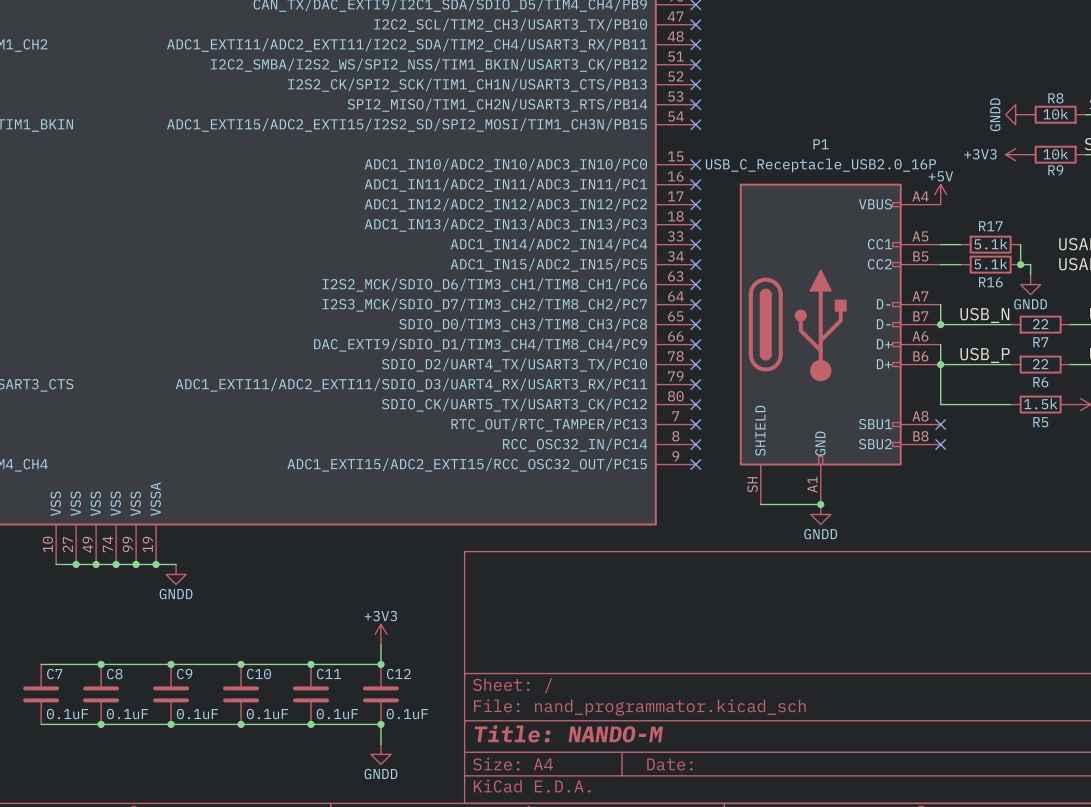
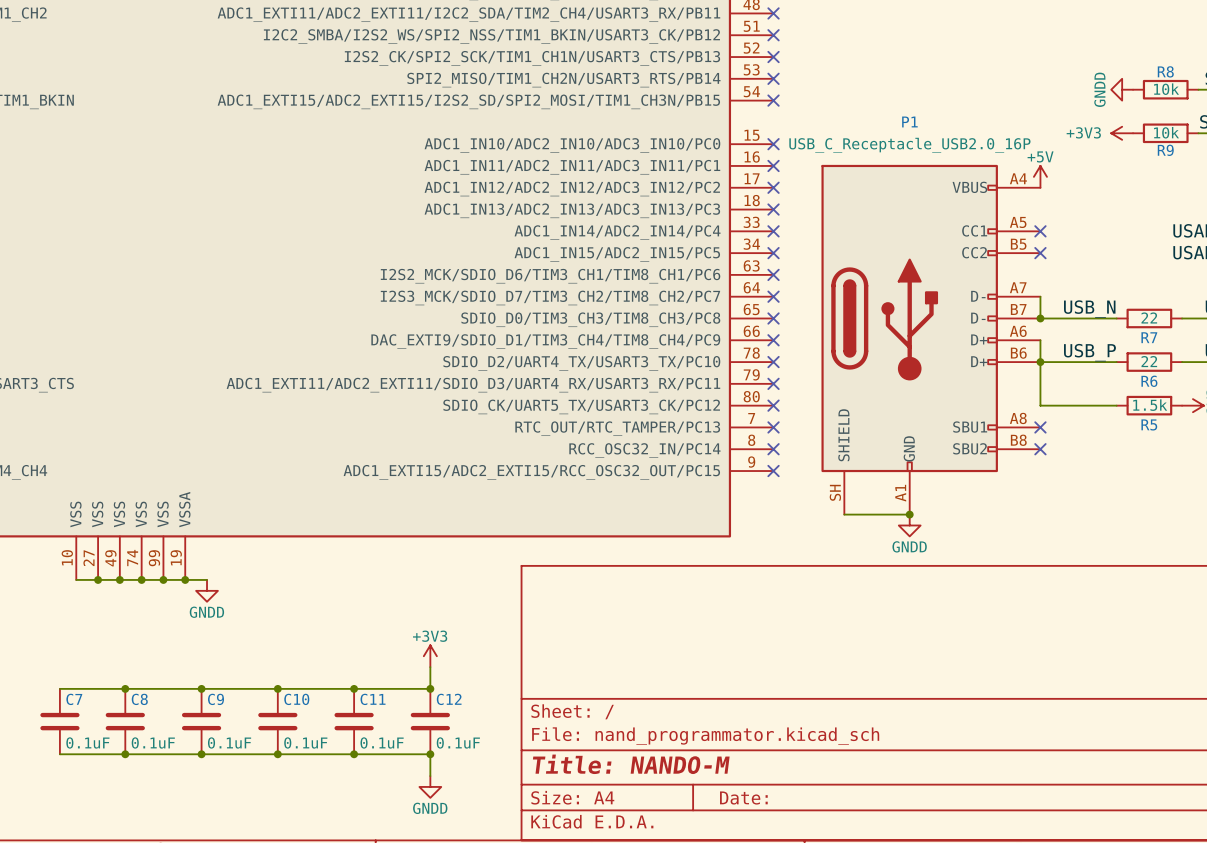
wire: (940, 244) (960, 244) -> none
no-connect mark: none -> (1040, 231)
R17: 5.1k (990, 244) -> none
wire: (1020, 244) (1020, 264) (1030, 264) (1030, 274) -> none
wire: (940, 264) (960, 264) -> none
no-connect mark: none -> (1040, 253)
R16: 5.1k (990, 264) -> none
junction: (1020, 264) -> none
power symbol: GNDD (1030, 284) -> none

